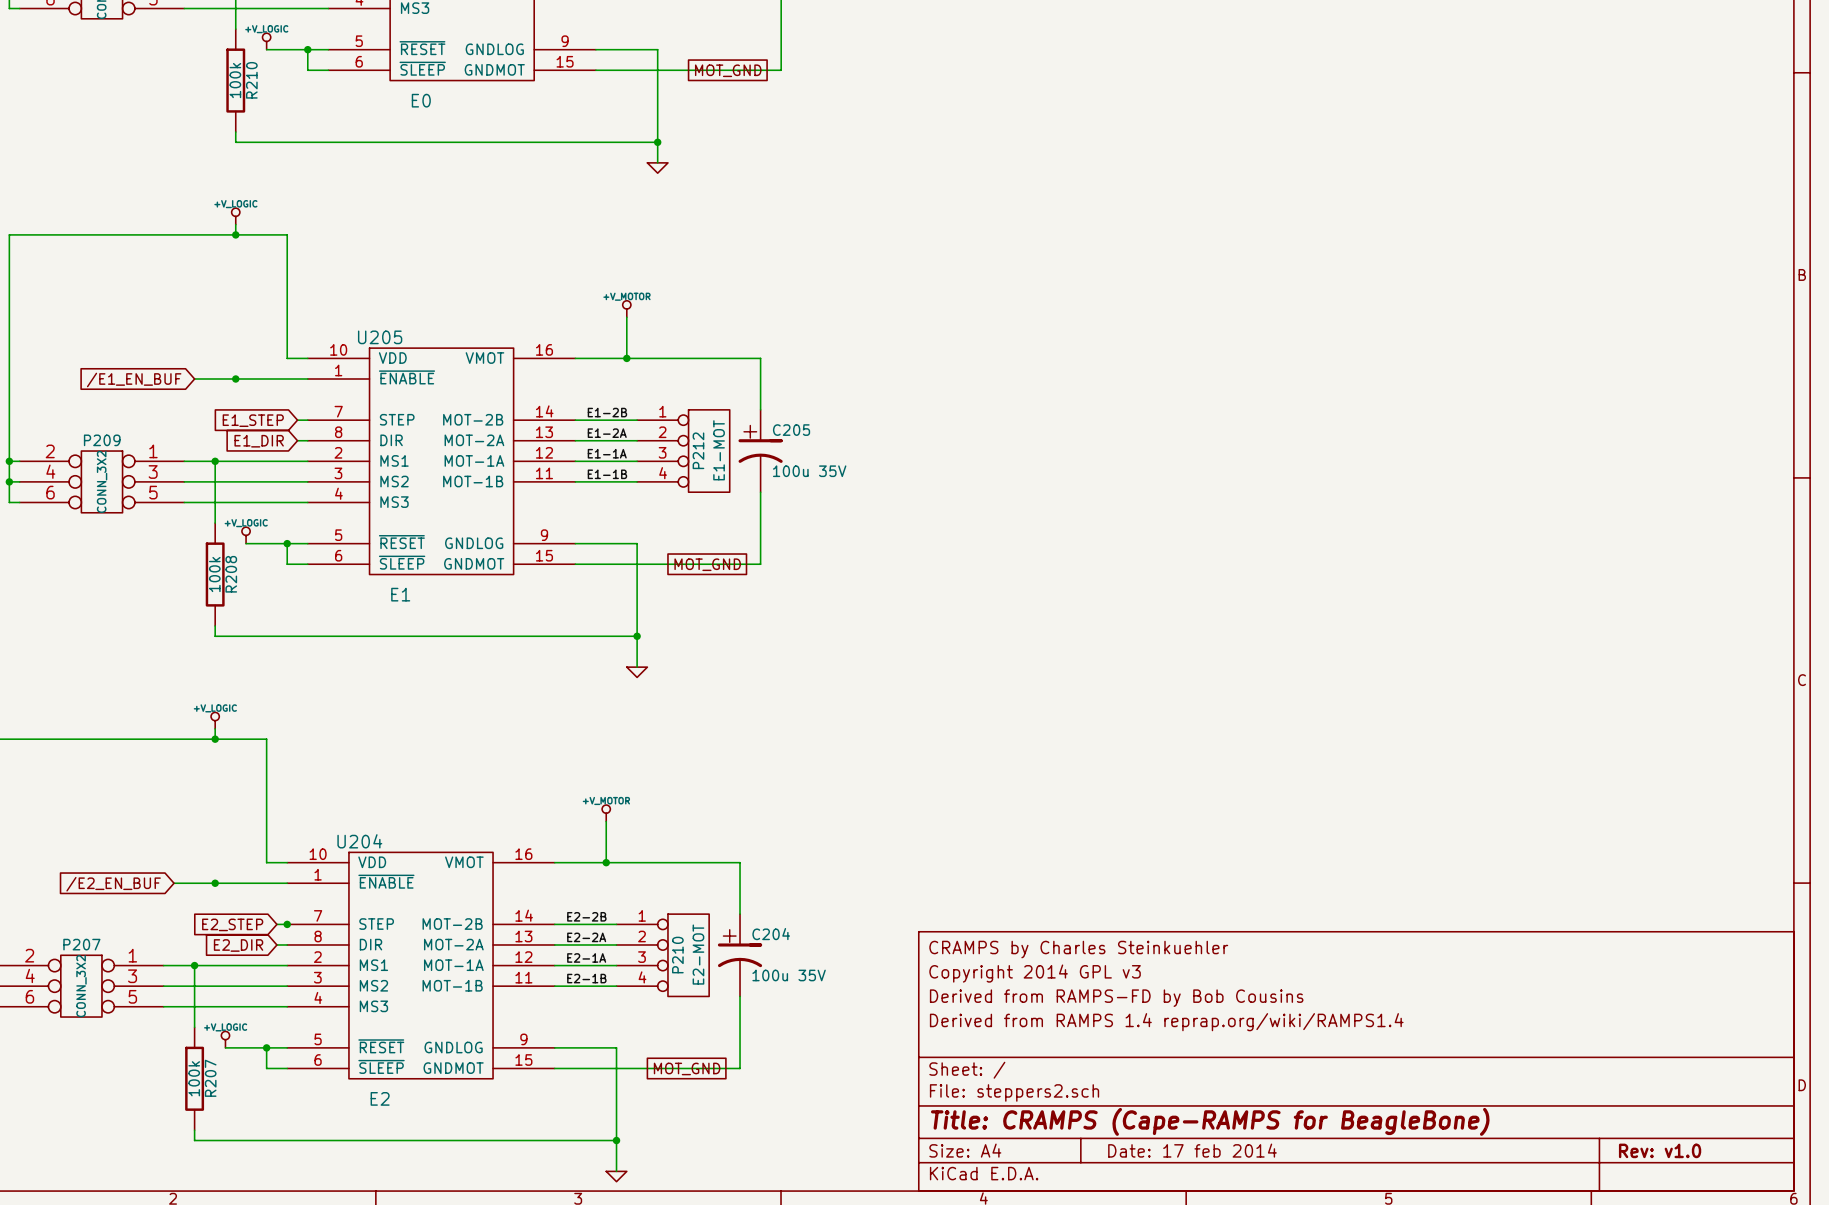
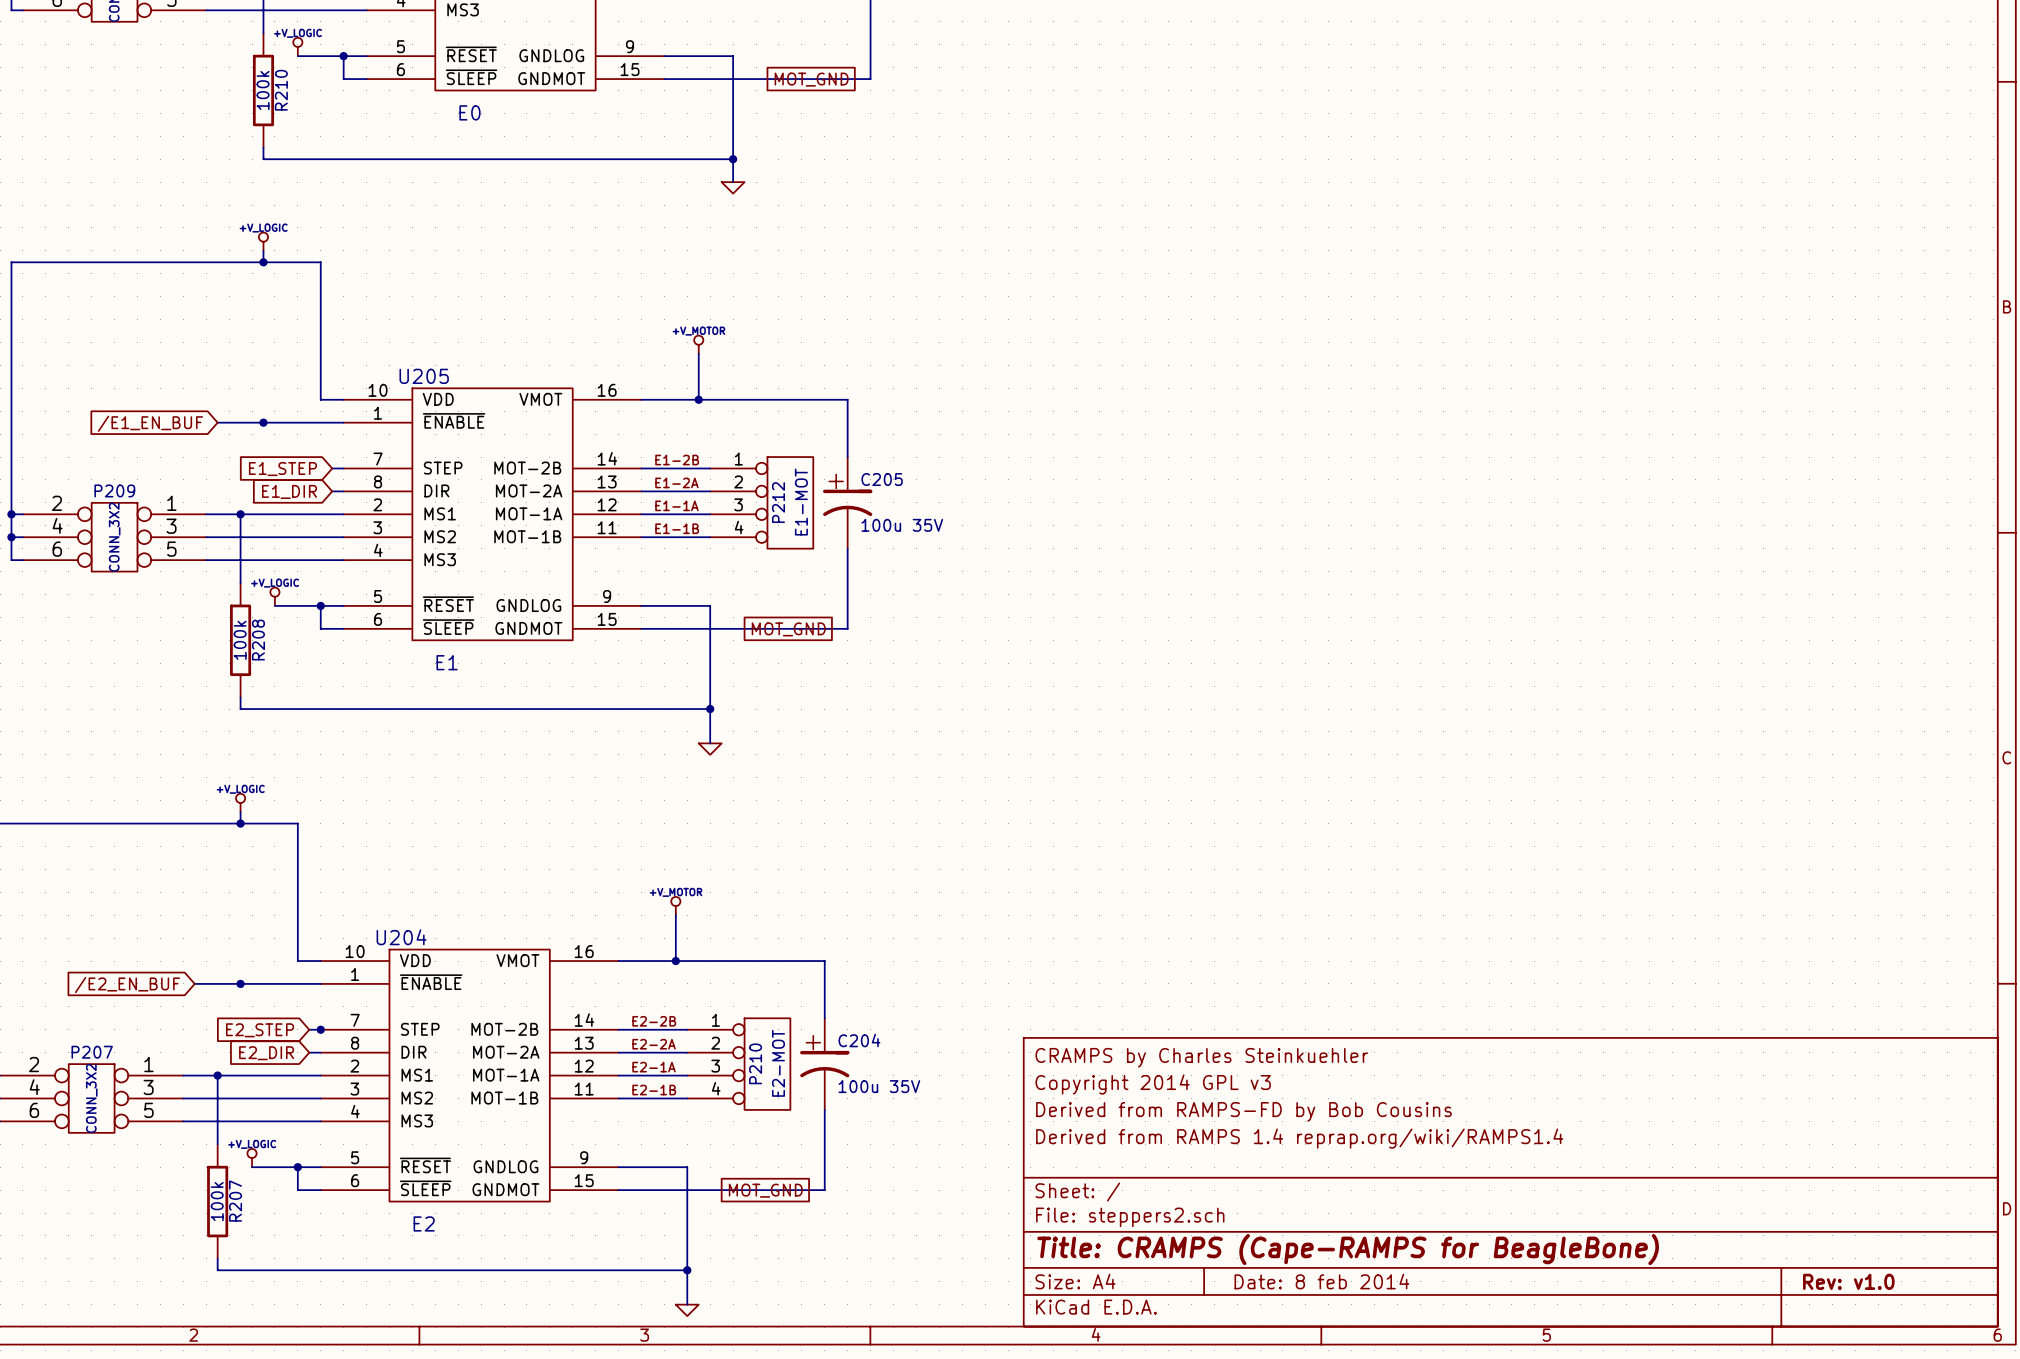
title block: Date: 17 feb 2014 (1192, 1150) -> Date: 8 feb 2014 (1321, 1281)

